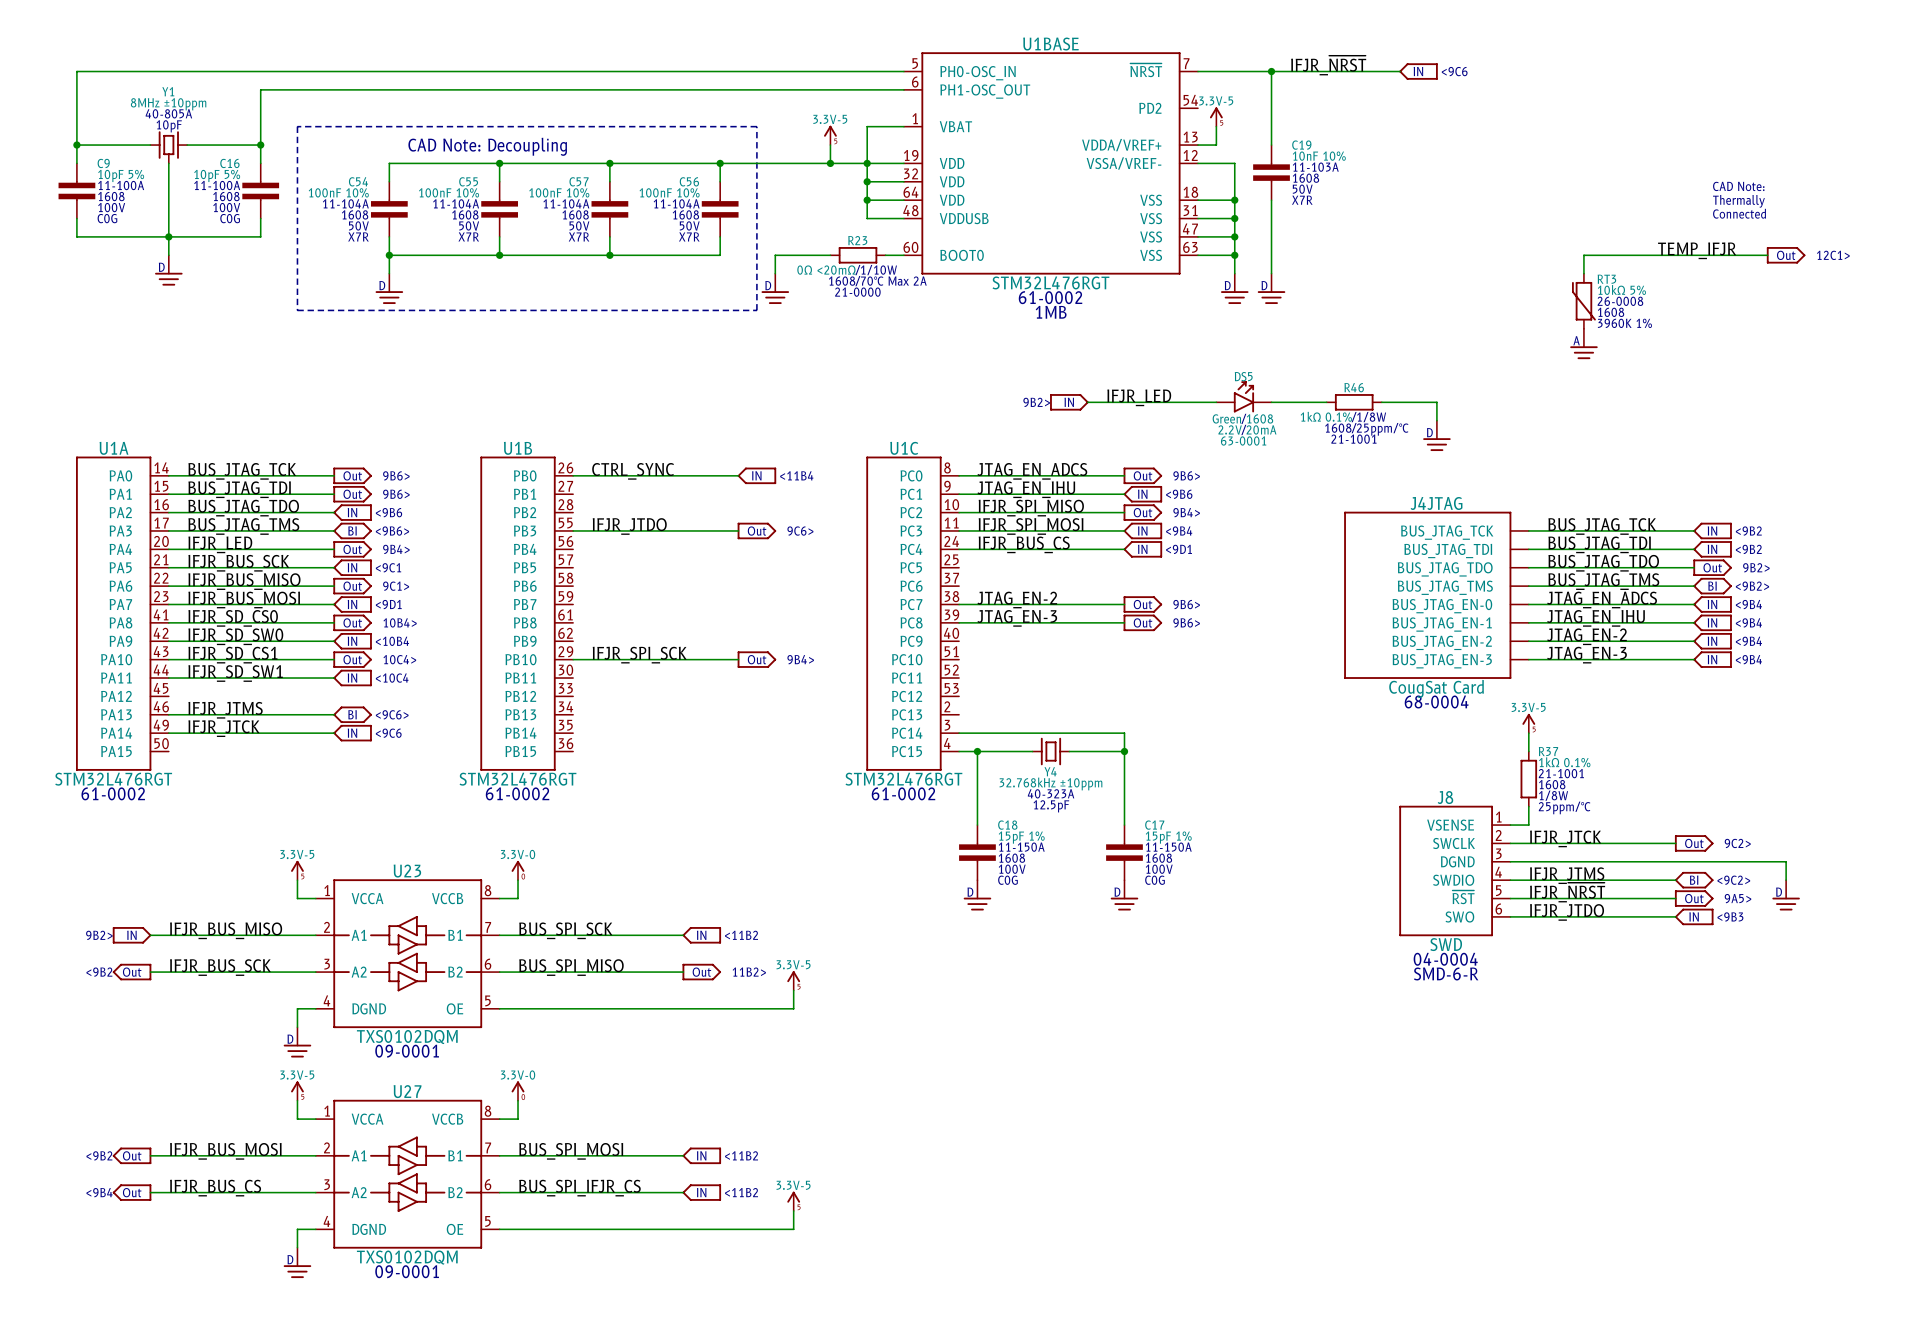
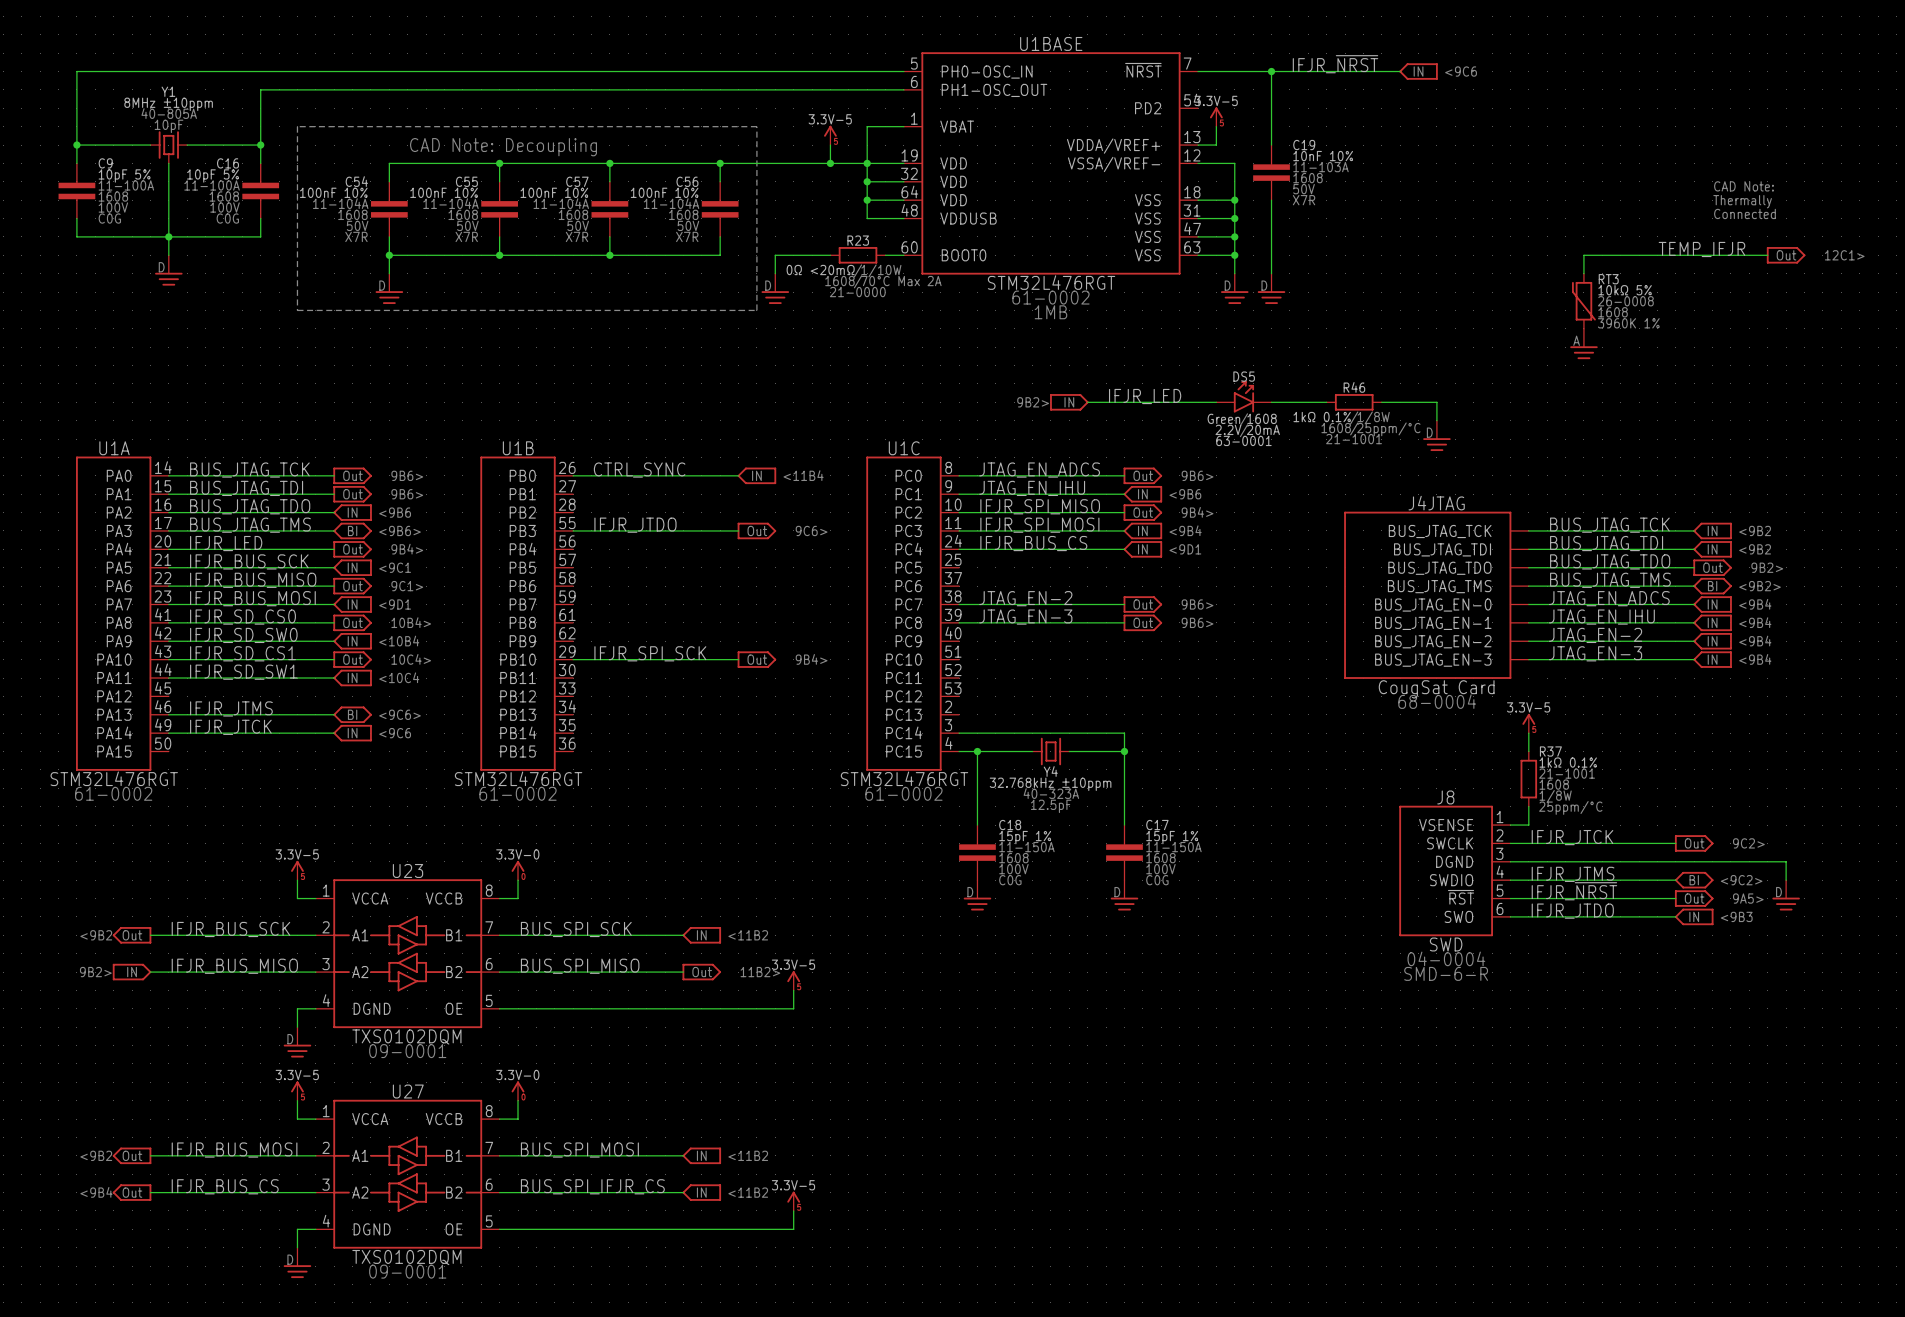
part symbol: [112, 927, 152, 944] -> [112, 927, 152, 944]
label: IFJR_BUS_MISO (226, 930) -> IFJR_BUS_SCK (230, 929)
text: 9B2> (99, 935) -> <9B2 (96, 935)
part symbol: [112, 963, 152, 981] -> [112, 963, 152, 981]
label: IFJR_BUS_SCK (220, 967) -> IFJR_BUS_MISO (234, 966)
text: <9B2 (99, 972) -> 9B2> (95, 972)

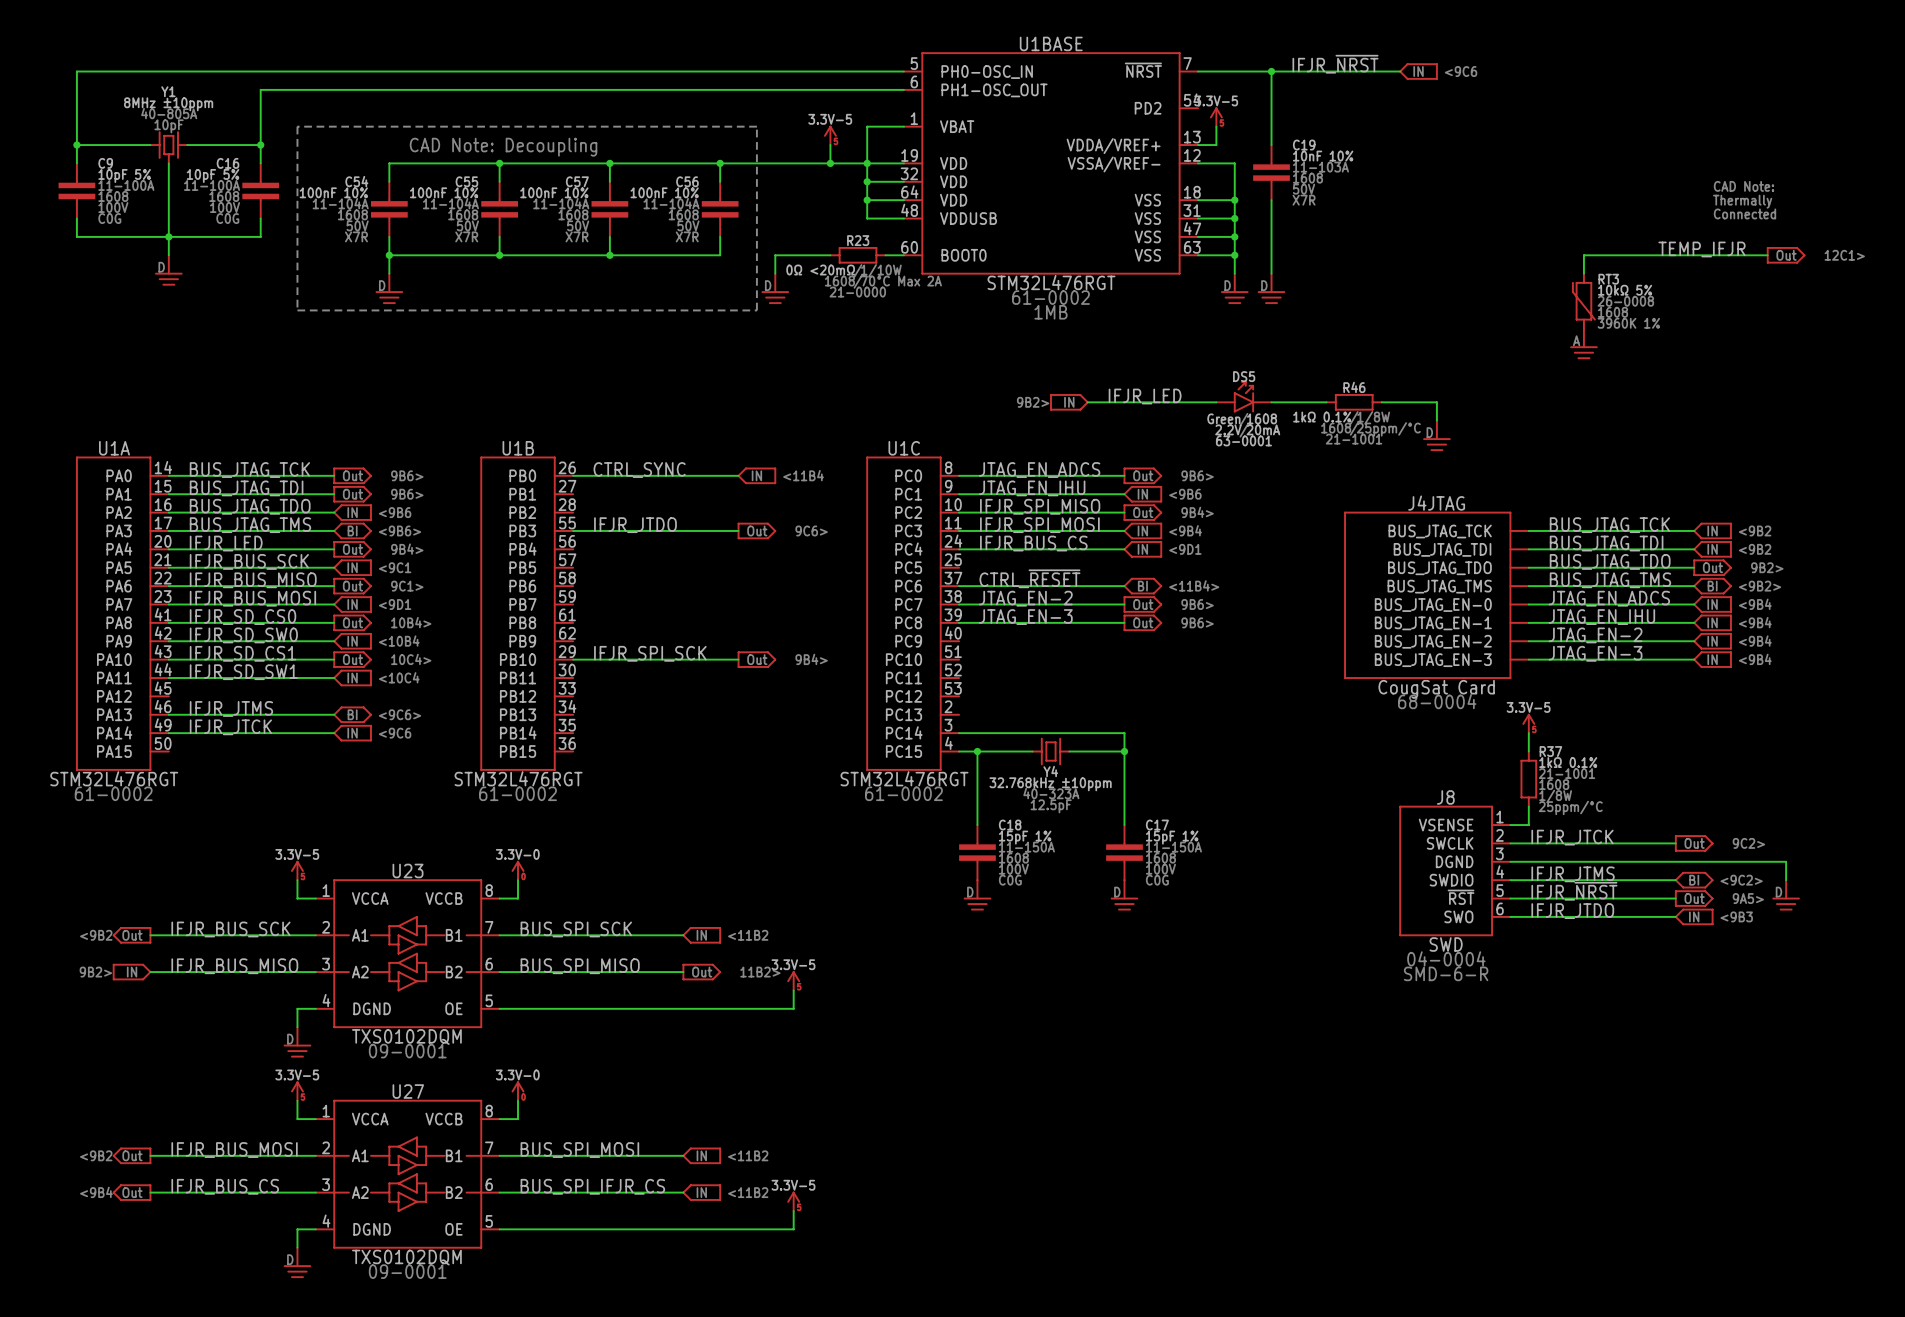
label: none -> CTRL_~{RESET} (1029, 578)
text: none -> <11B4> (1194, 585)
wire: none -> (959, 586) (1124, 586)
part: none -> (1142, 586)

